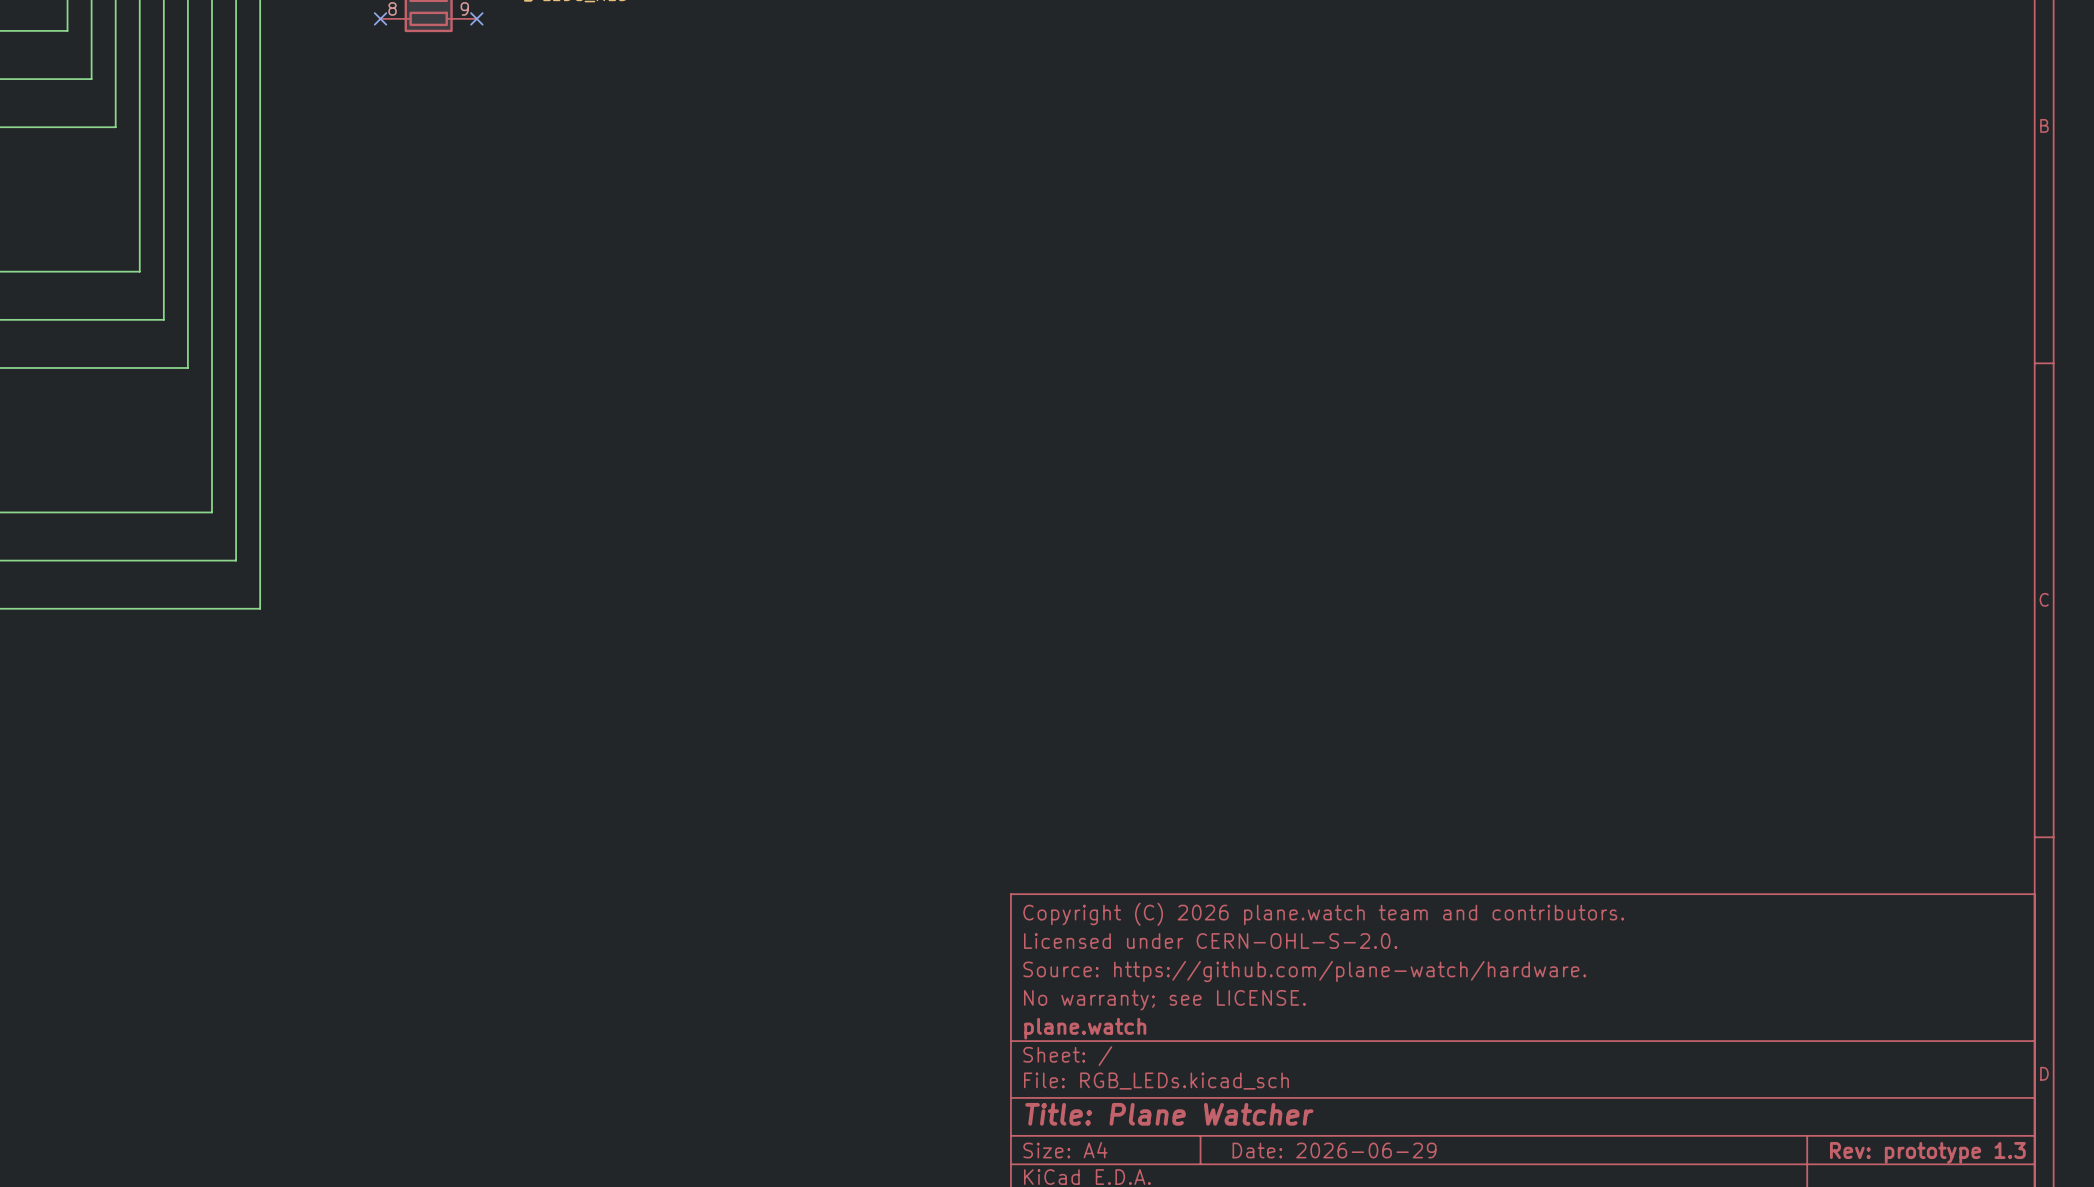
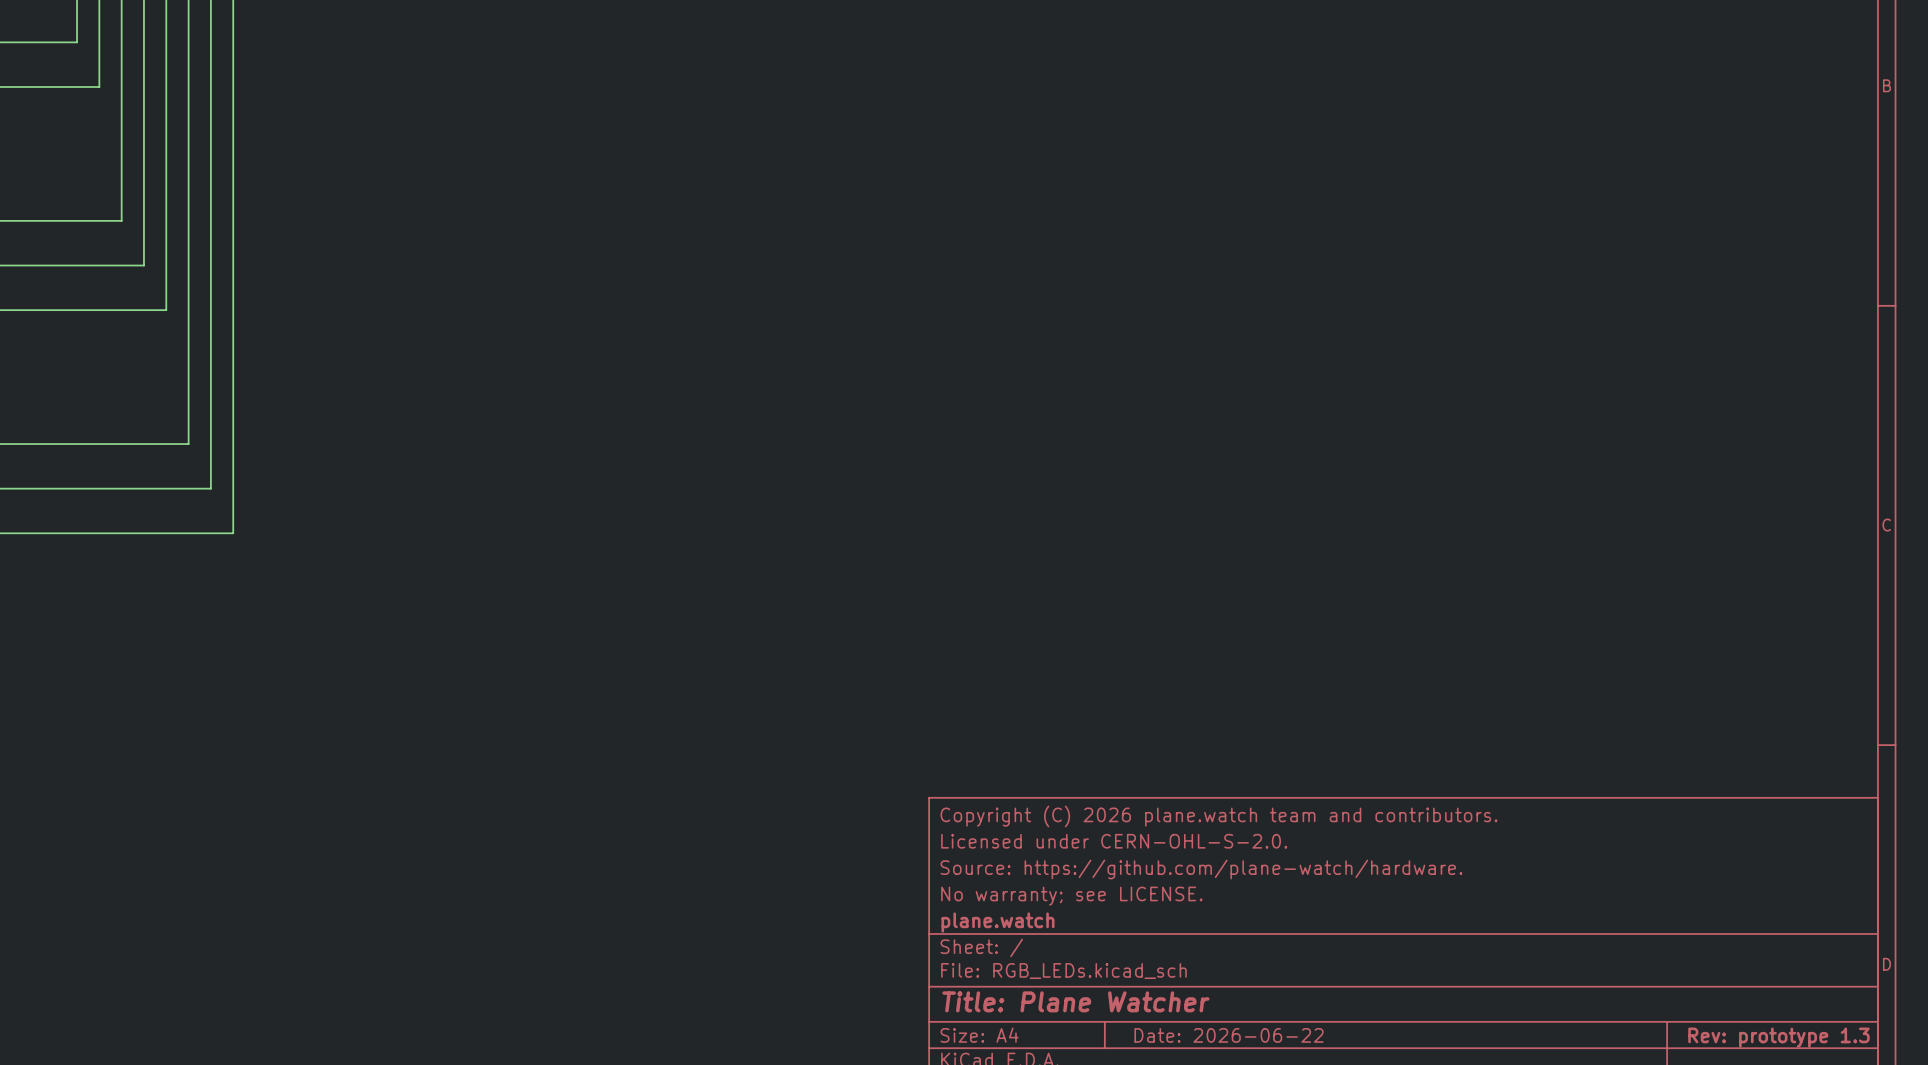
title block: Date: 2026-06-29 (1334, 1150) -> Date: 2026-06-22 (1229, 1035)

